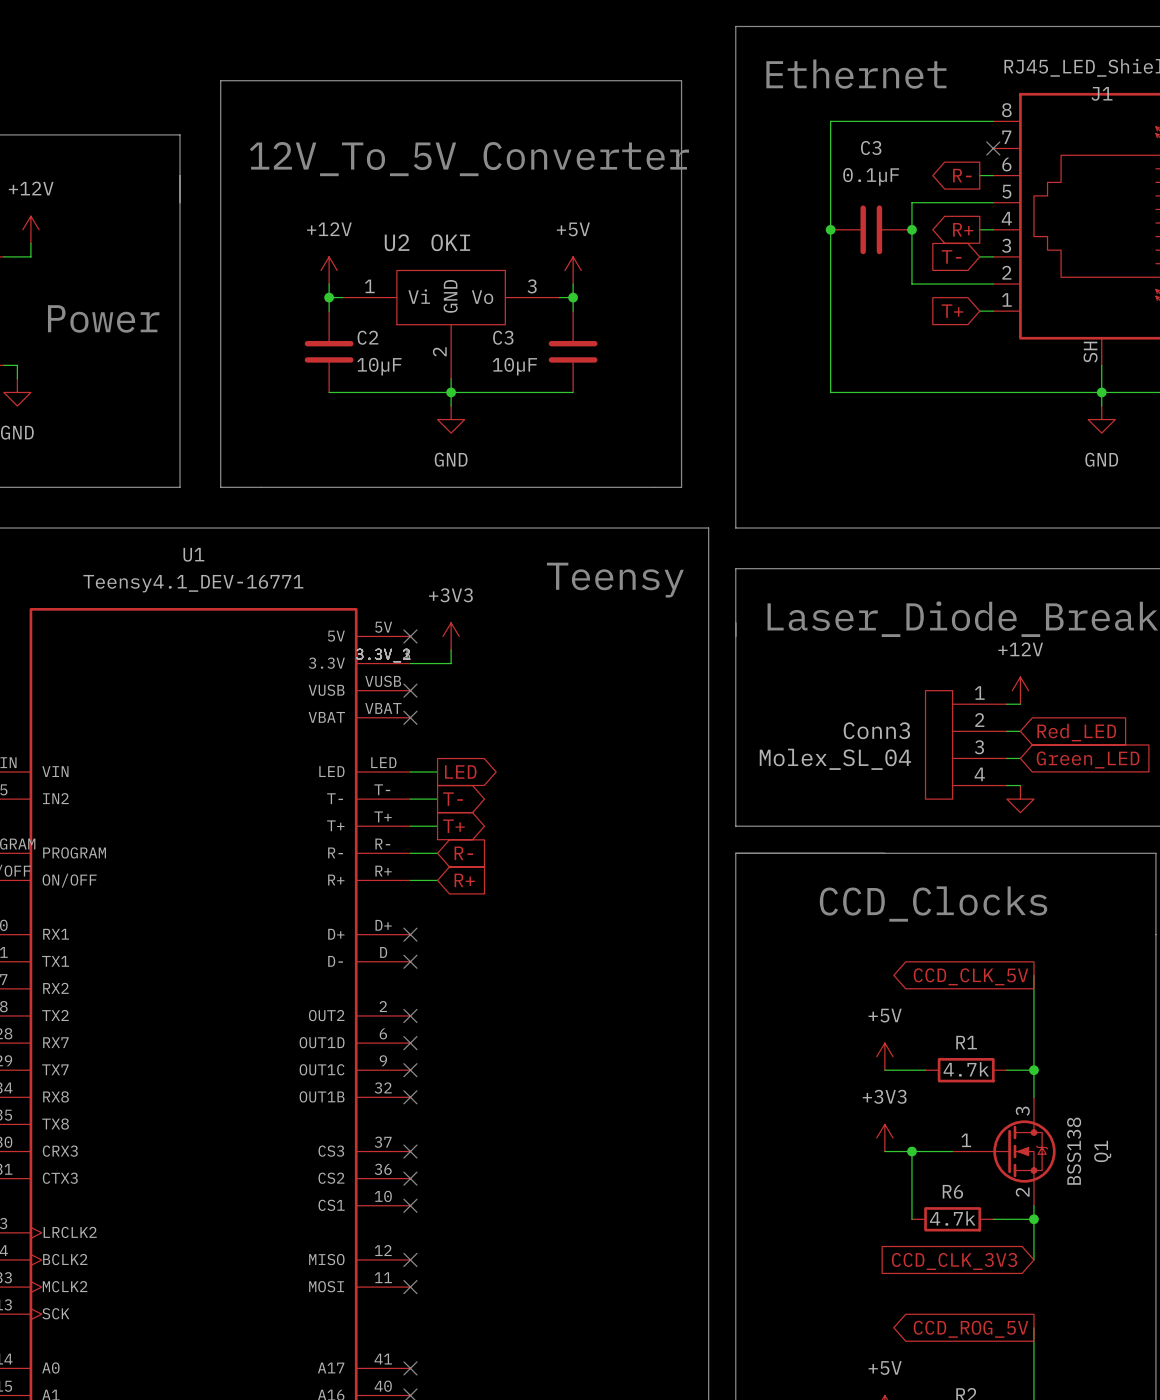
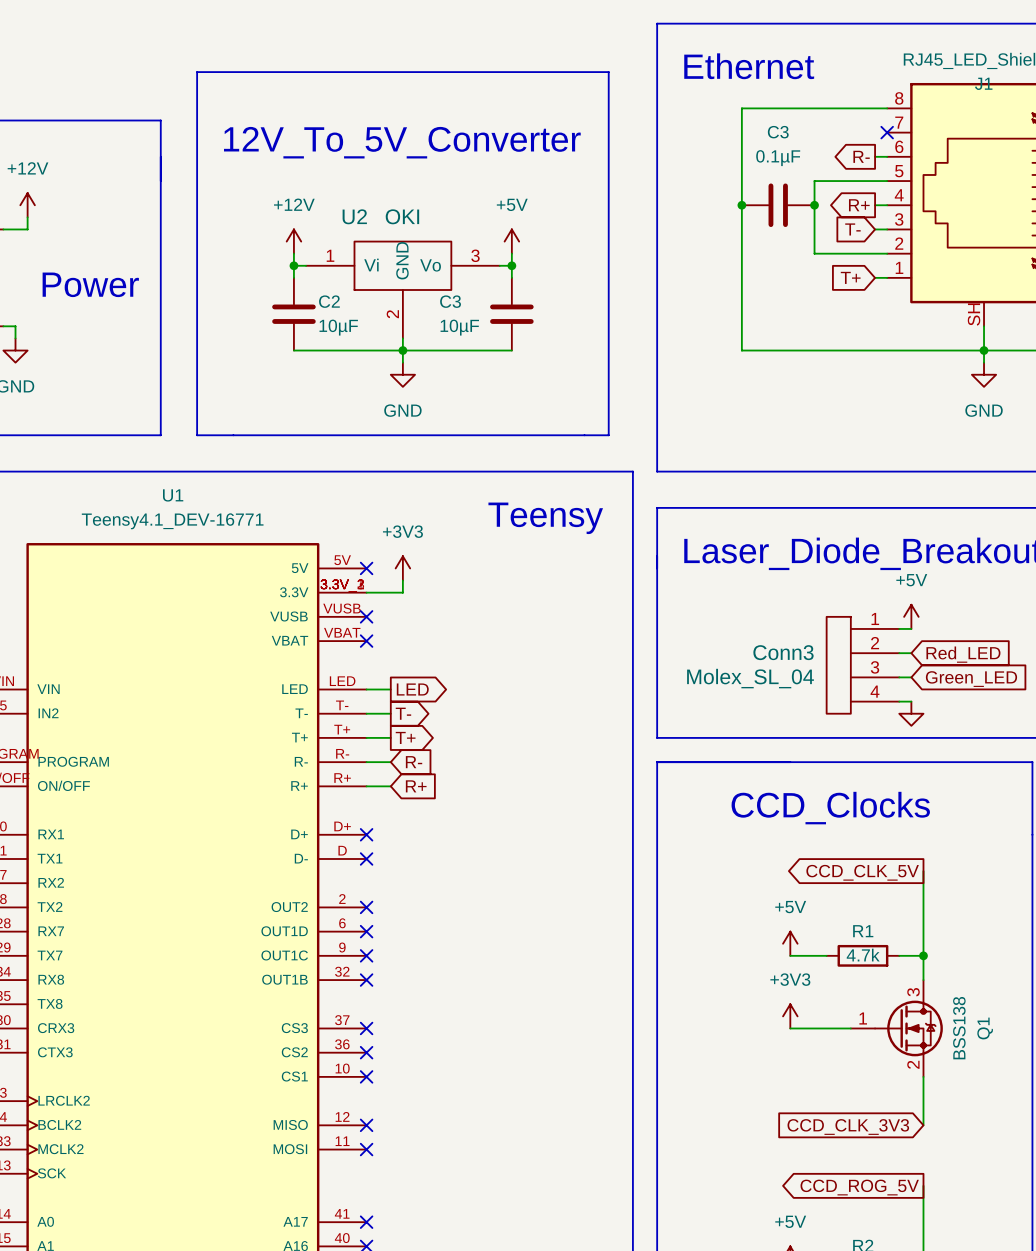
power symbol: +12V (1020, 690) -> +5V (911, 616)
wire: (911, 1151) (911, 1219) -> none
junction: (911, 1151) -> none
R6: 4.7k (952, 1219) -> none
wire: (993, 1219) (1033, 1219) -> none
junction: (1033, 1219) -> none

